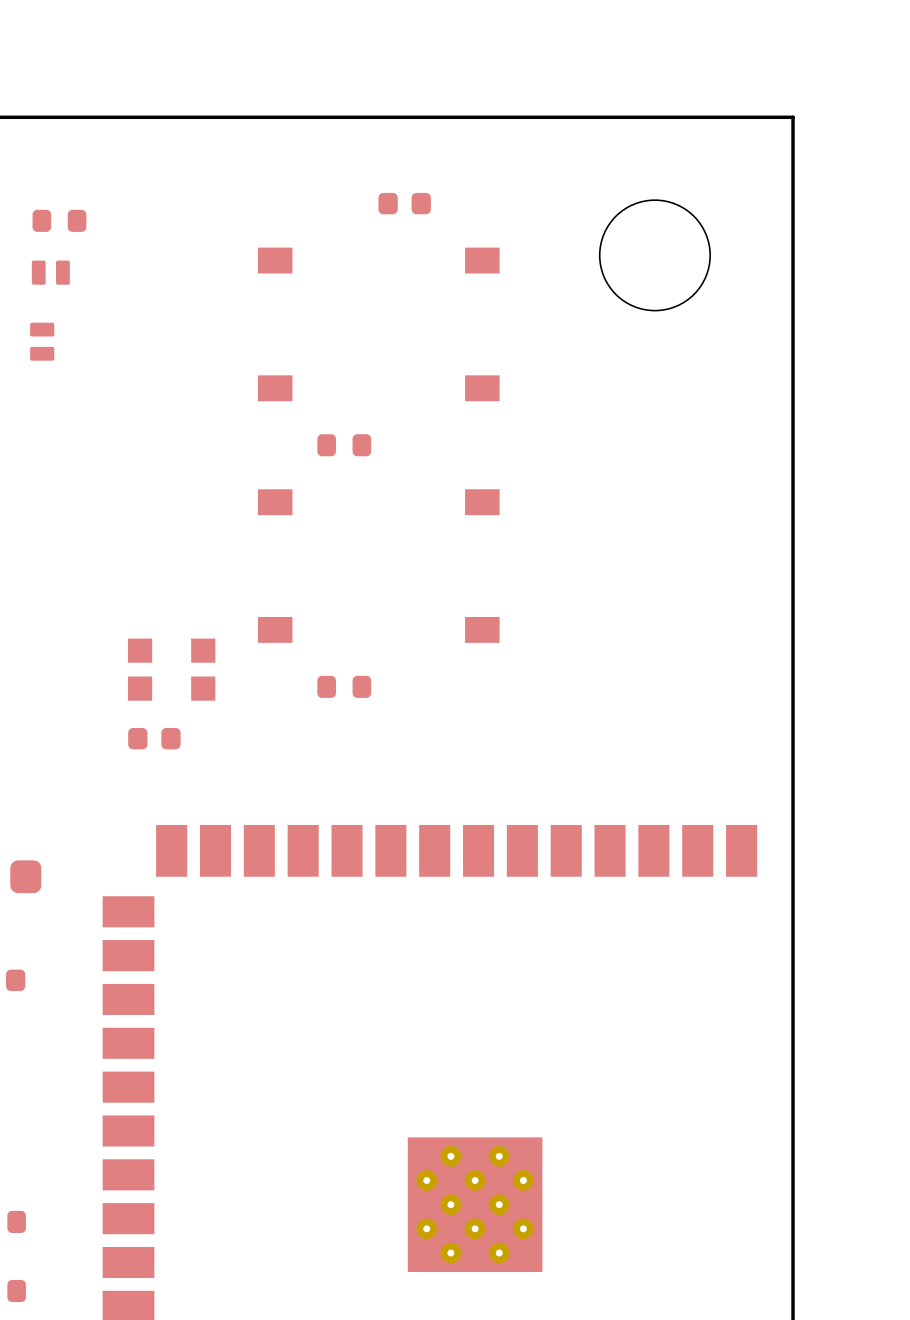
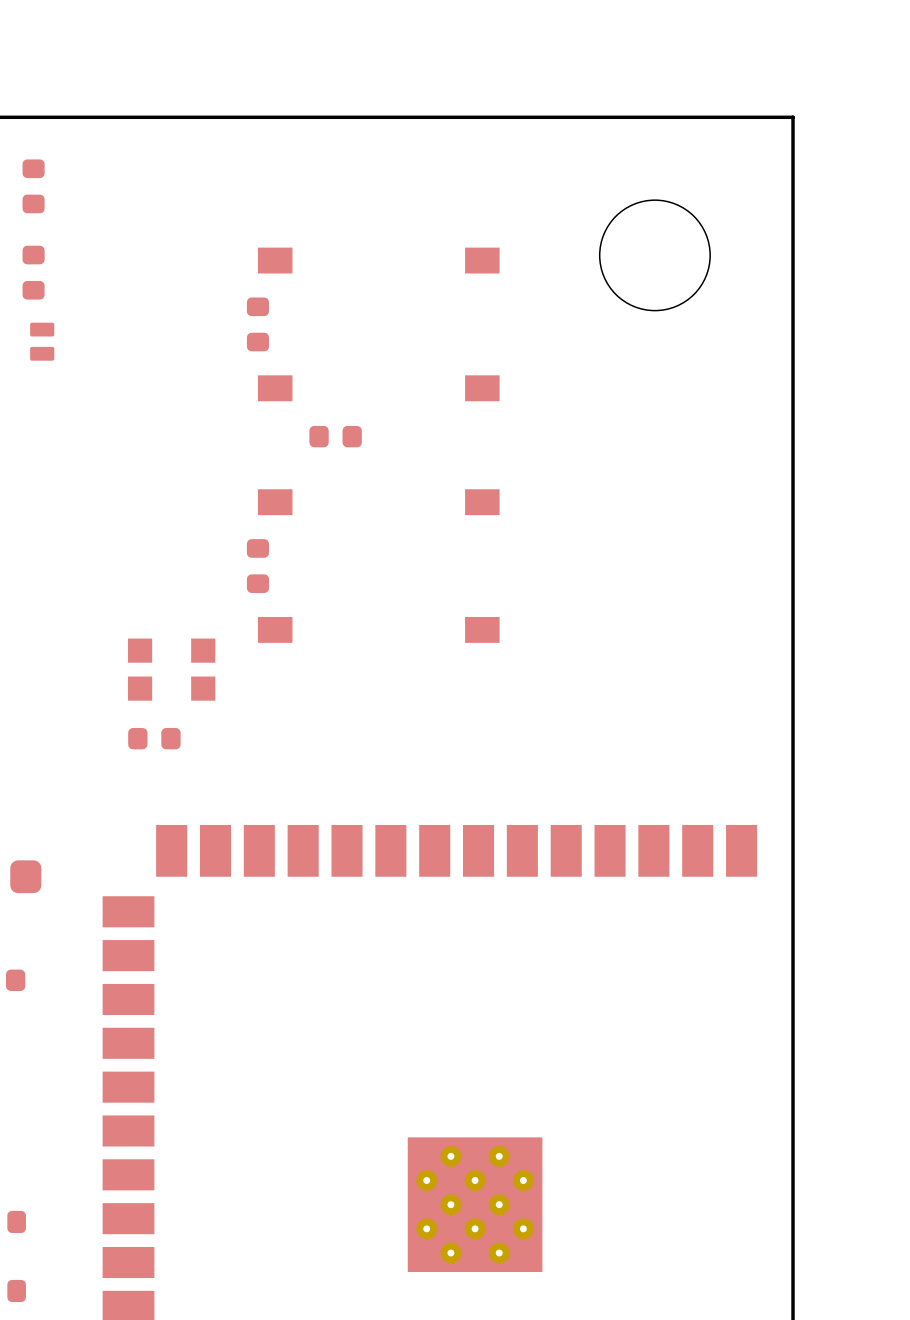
part: (404, 203) -> none
part rotation: 0° (59, 220) -> 90° clockwise (33, 186)
part position: (59, 220) -> (33, 186)
part footprint: [31, 260, 70, 285] -> [22, 245, 45, 300]
part: none -> (257, 324)
part footprint: [317, 434, 372, 457] -> [309, 425, 362, 448]
part rotation: 0° (344, 686) -> 90° clockwise (257, 566)
part position: (344, 686) -> (257, 566)

